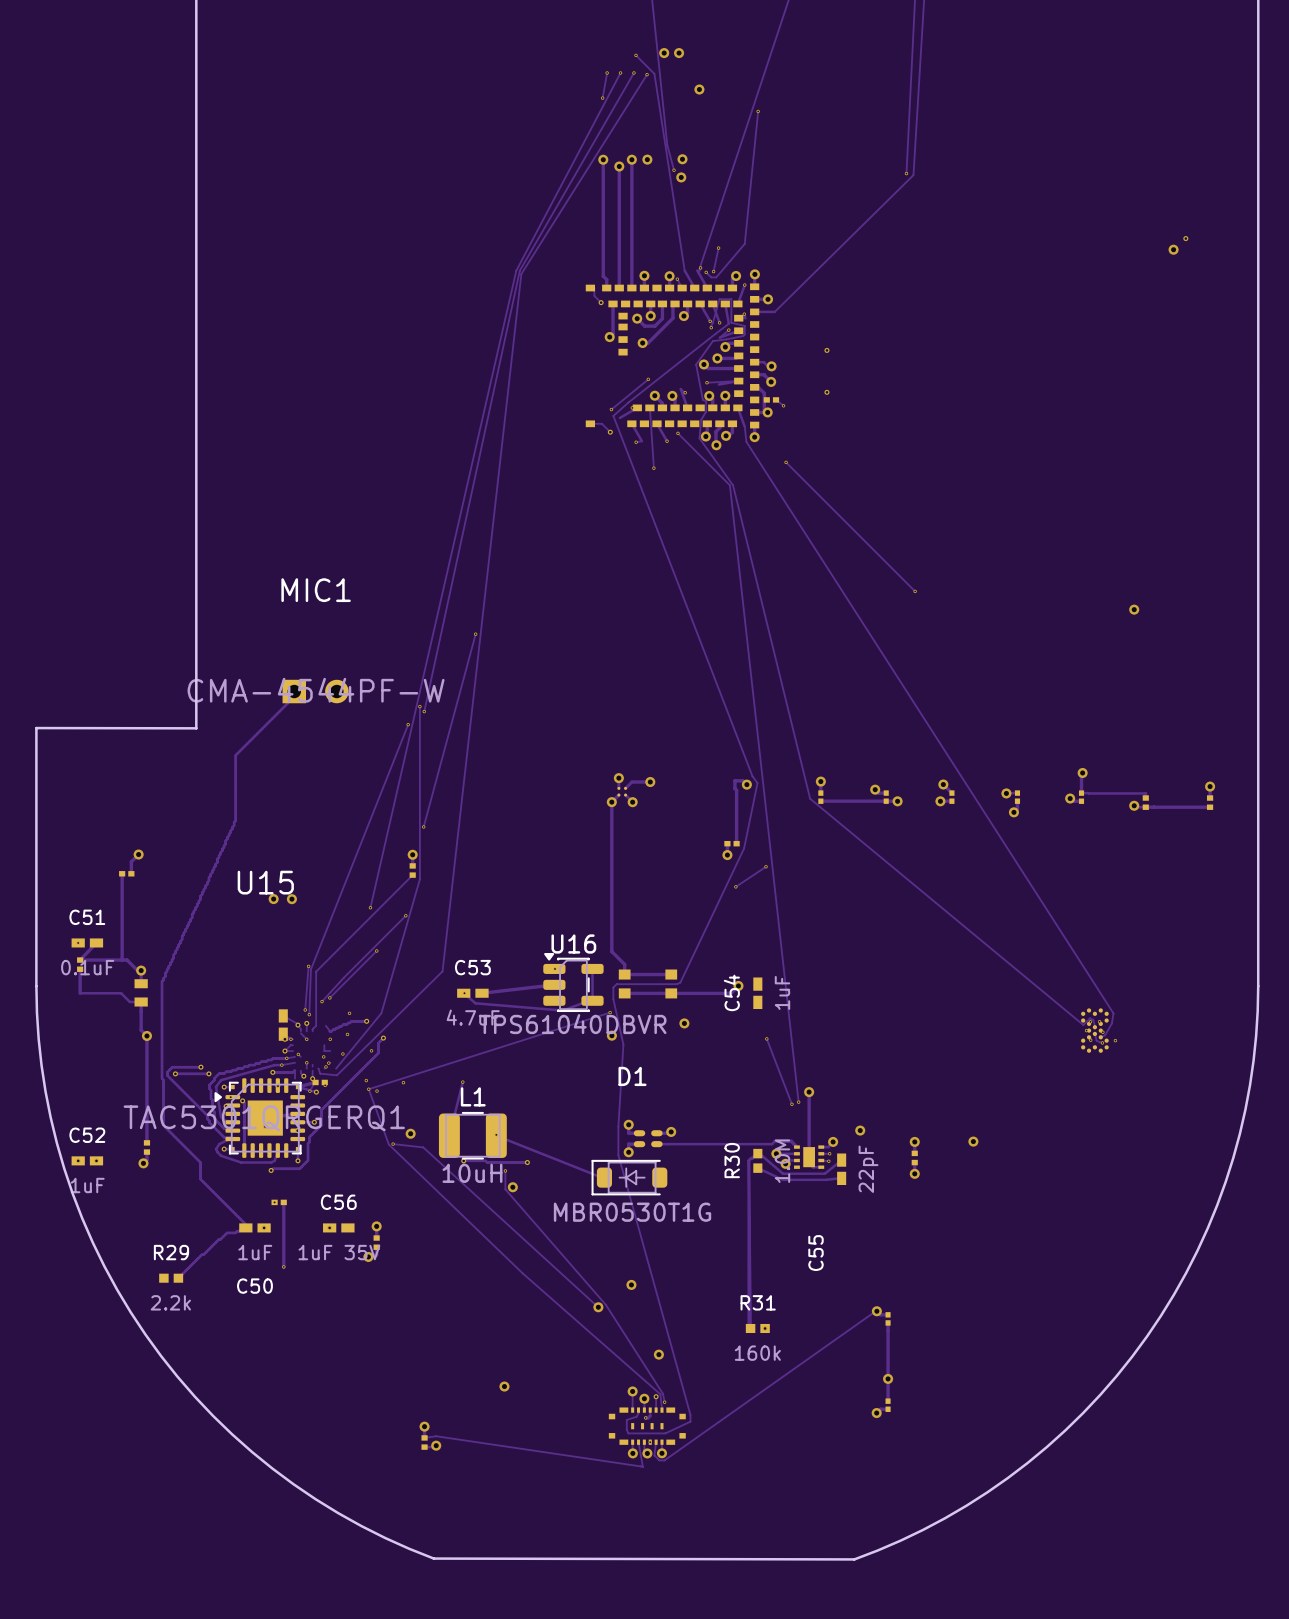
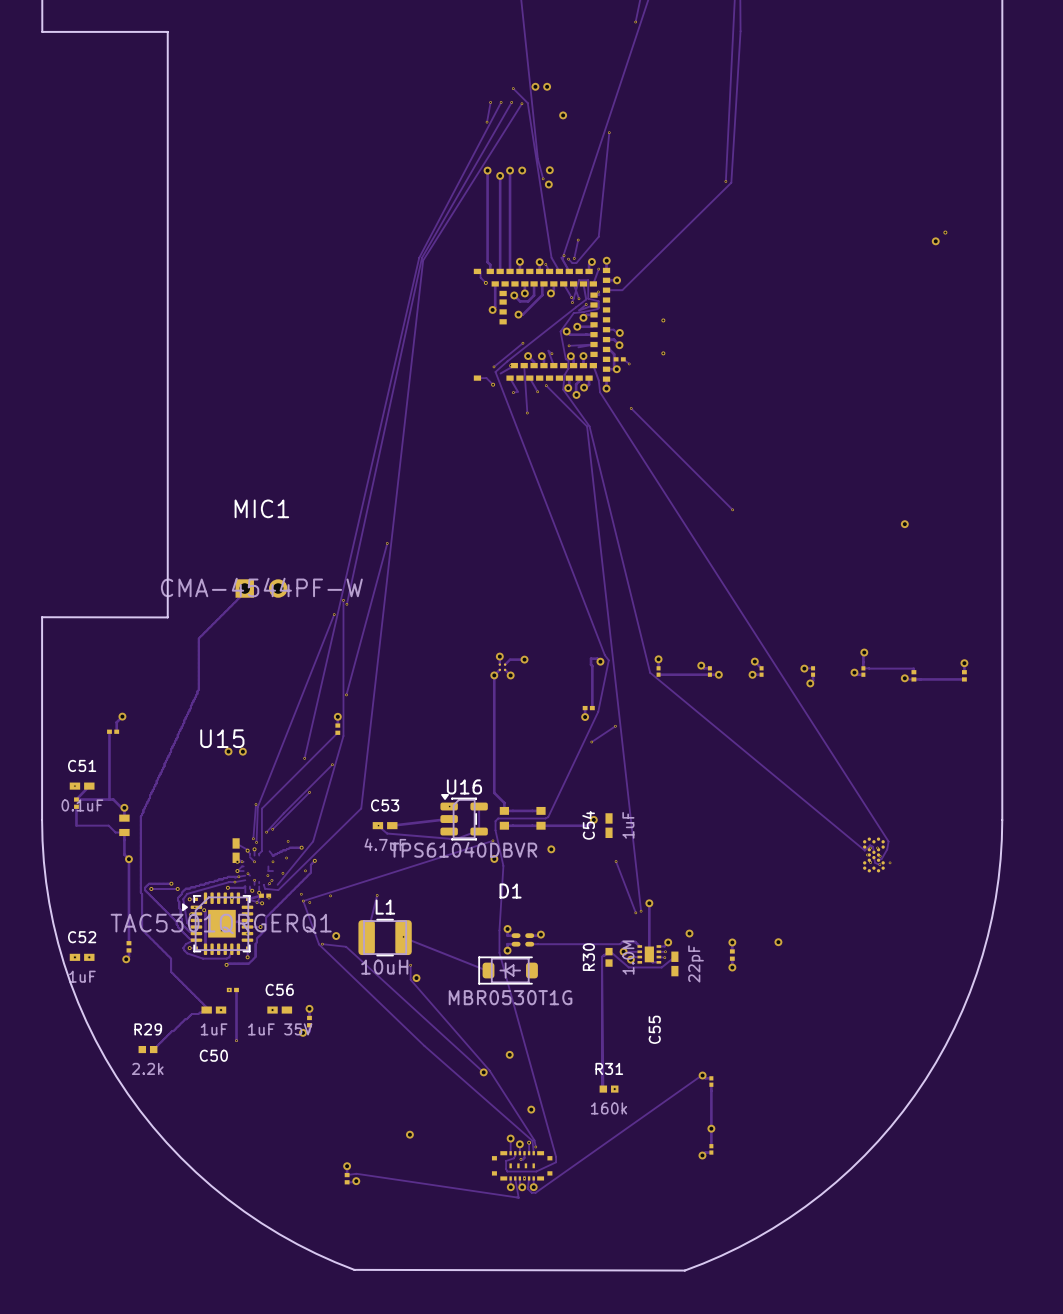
track: (463, 1160) (527, 1162) -> none
via: (463, 1160) -> none
via: (527, 1162) -> none
track: (757, 1168) (782, 1179) (841, 1178) -> none

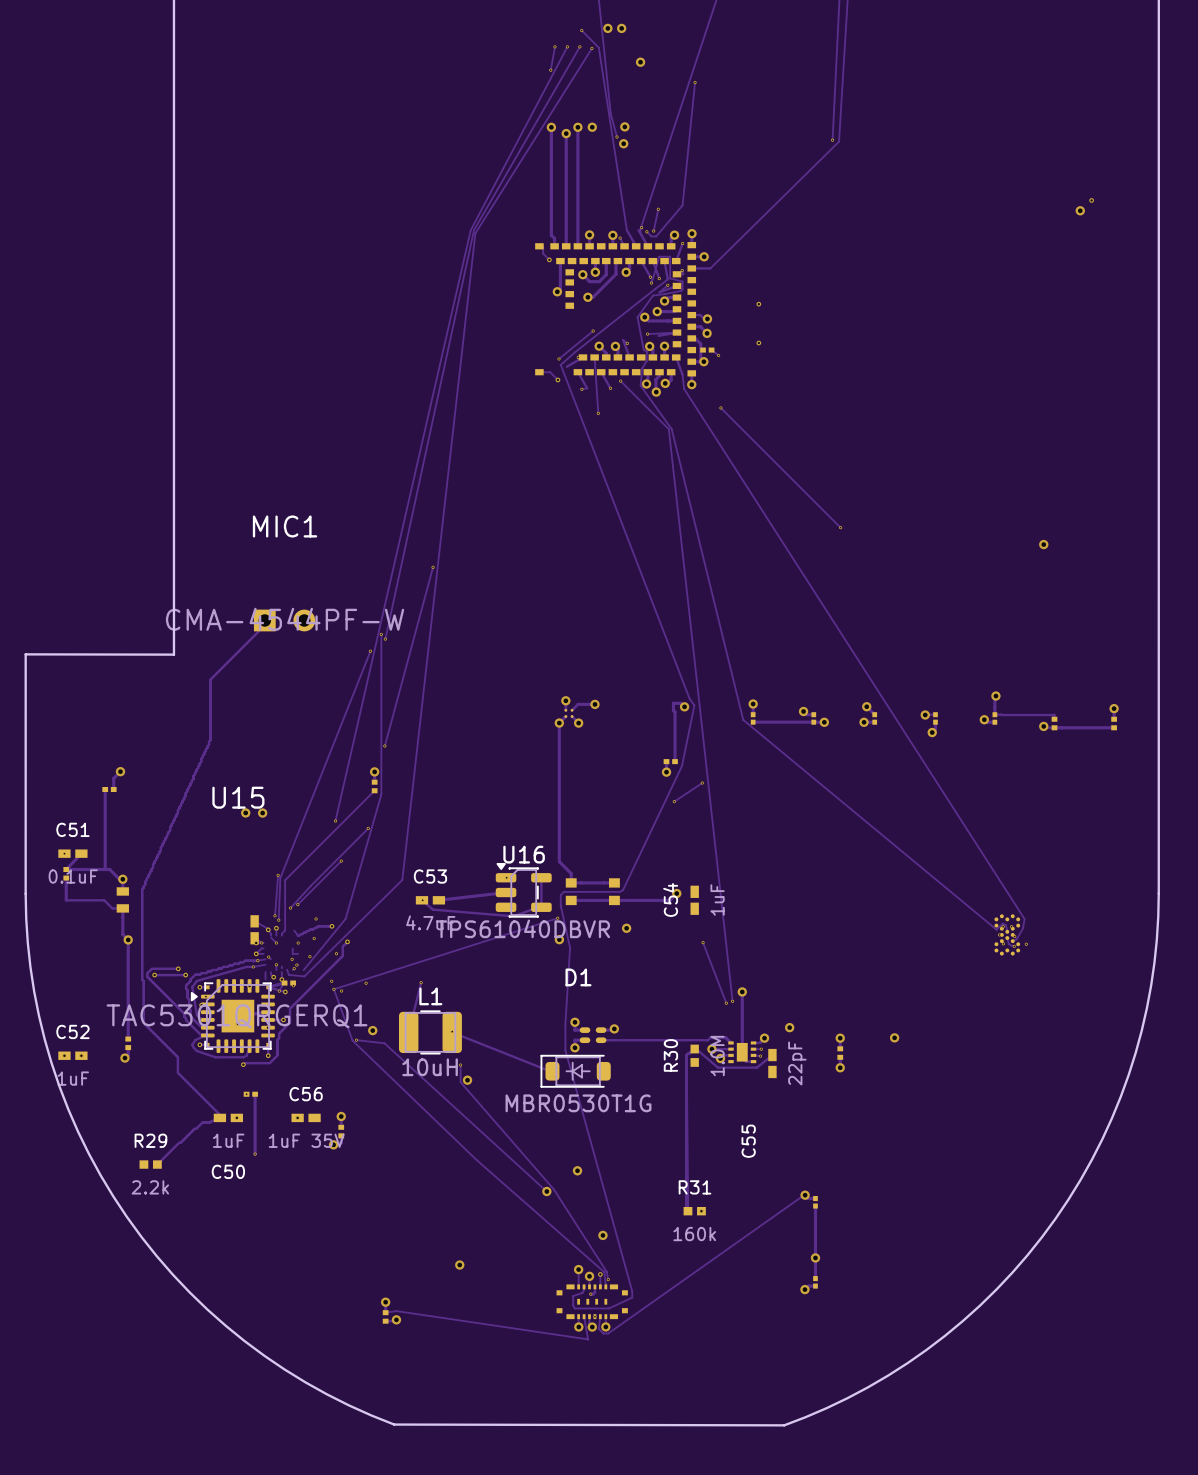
track: (245, 886) (227, 887) -> none
via: (227, 887) -> none
track: (204, 910) (205, 949) -> none
via: (204, 910) -> none

